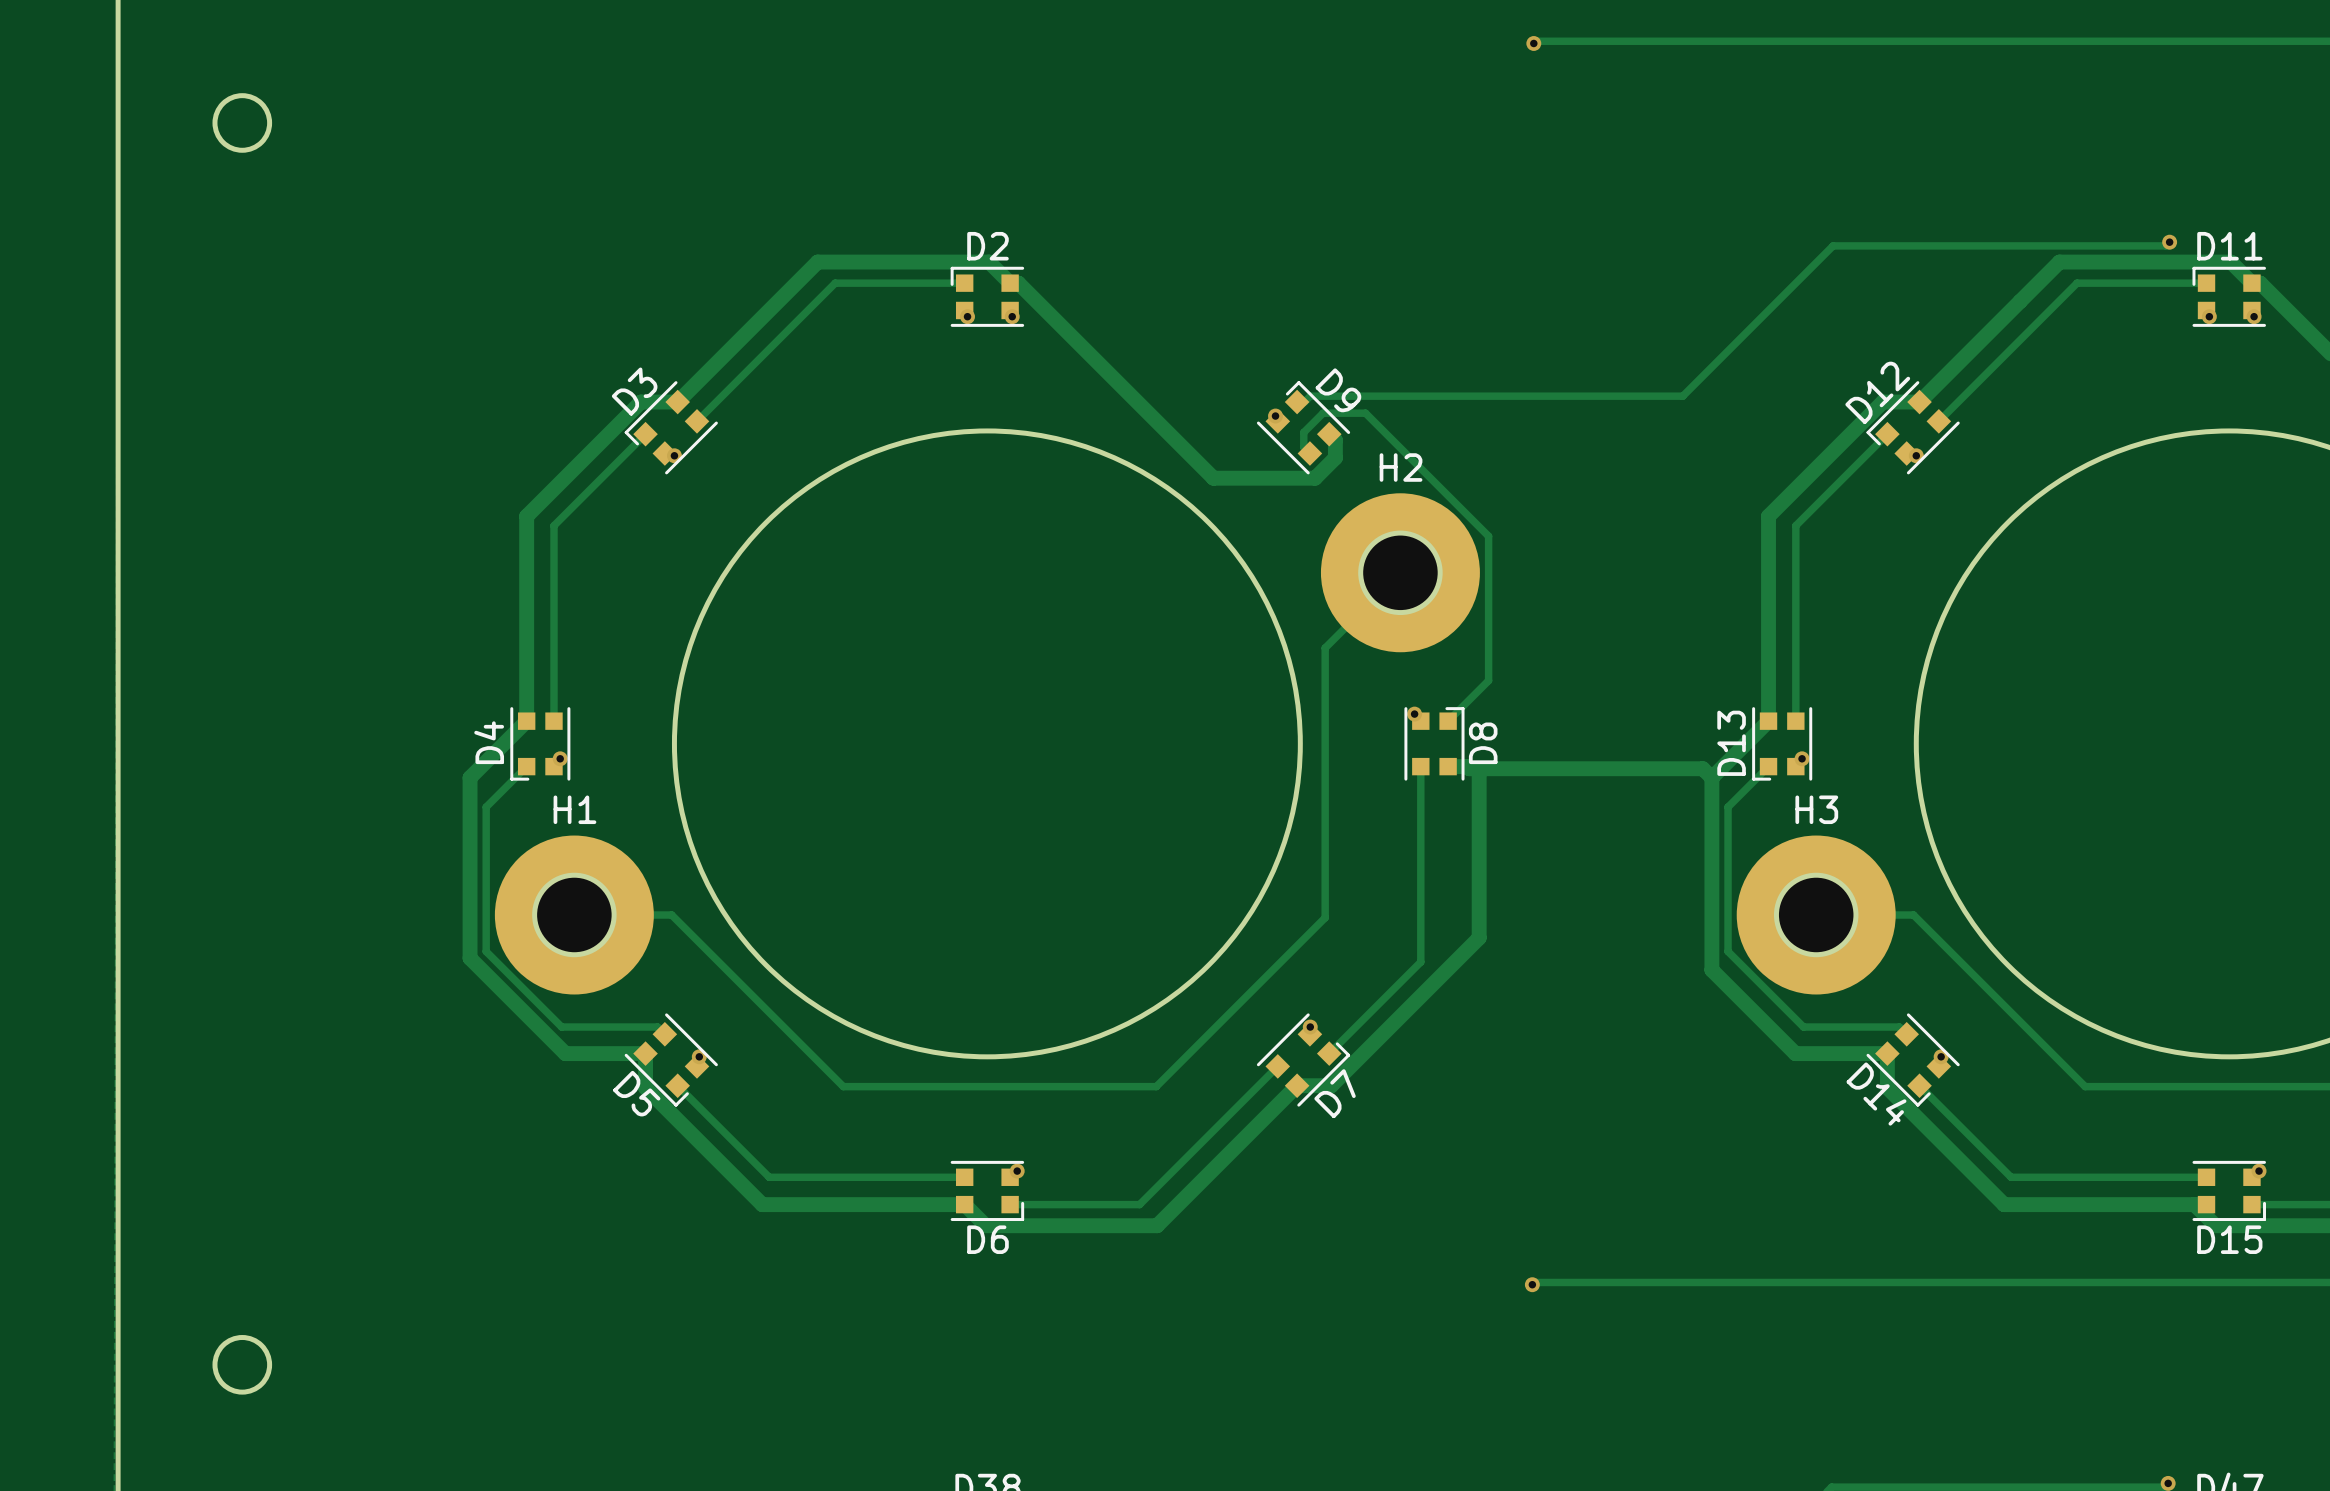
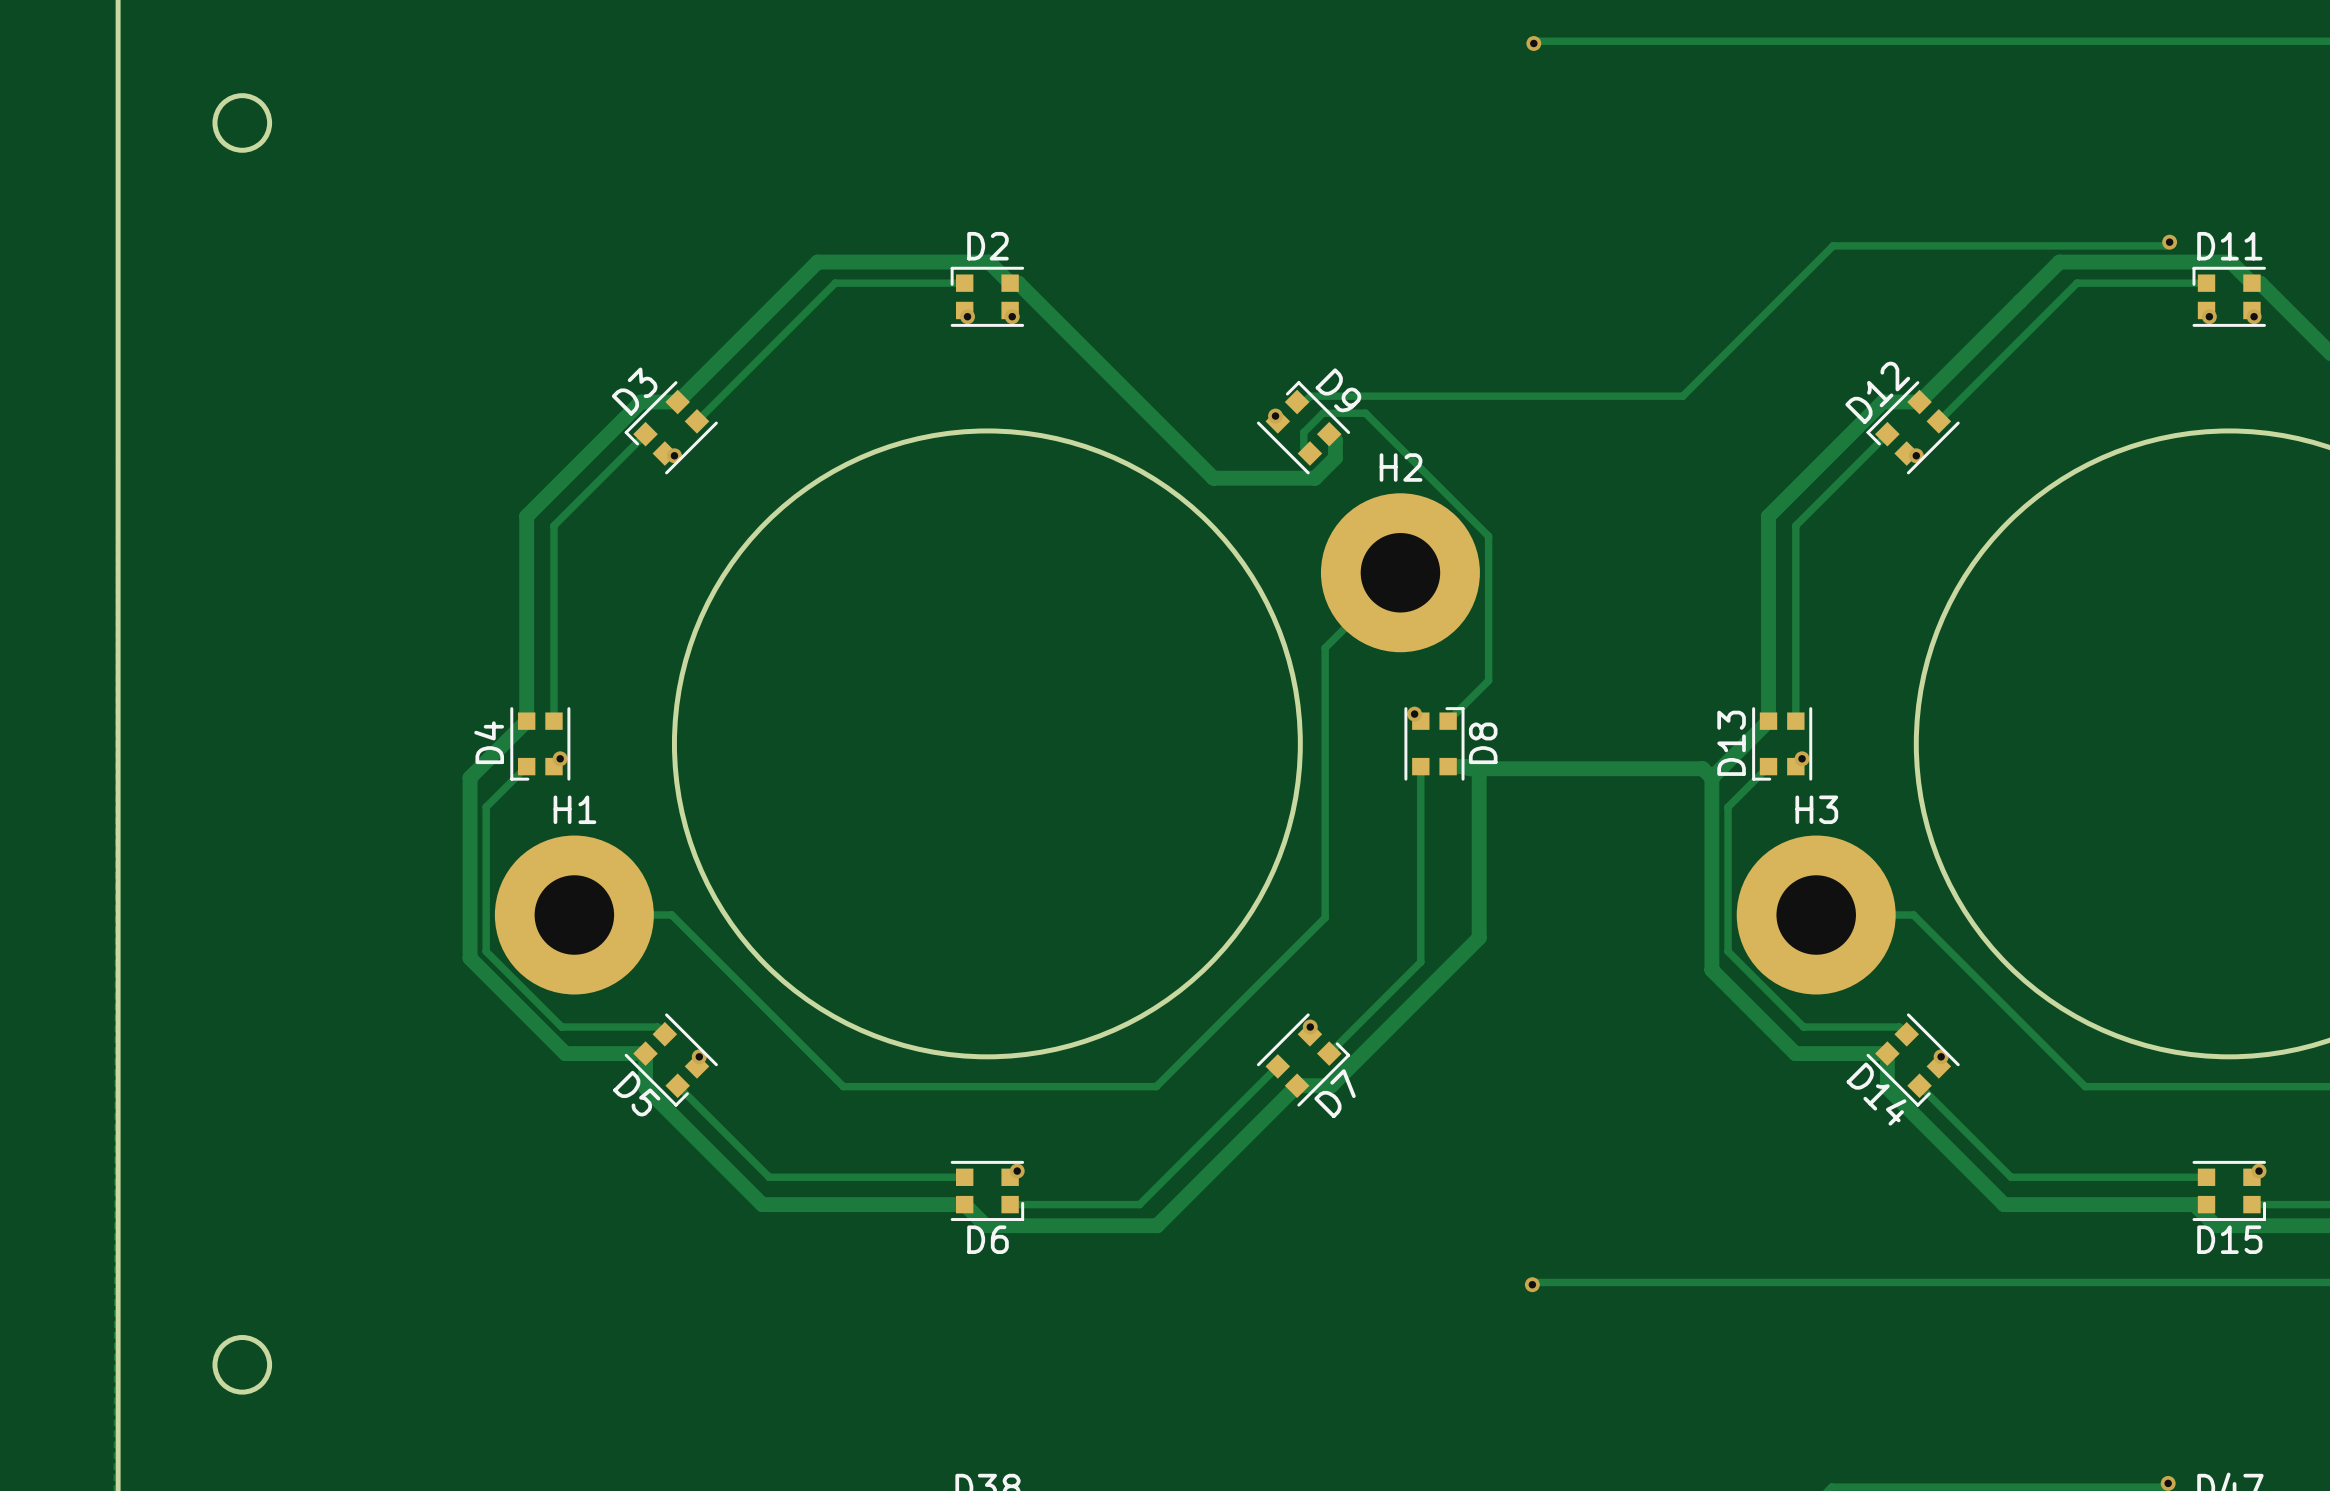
round board edge: [1358, 530, 1443, 616] -> none
round board edge: [532, 872, 617, 958] -> none
round board edge: [1773, 872, 1859, 958] -> none

